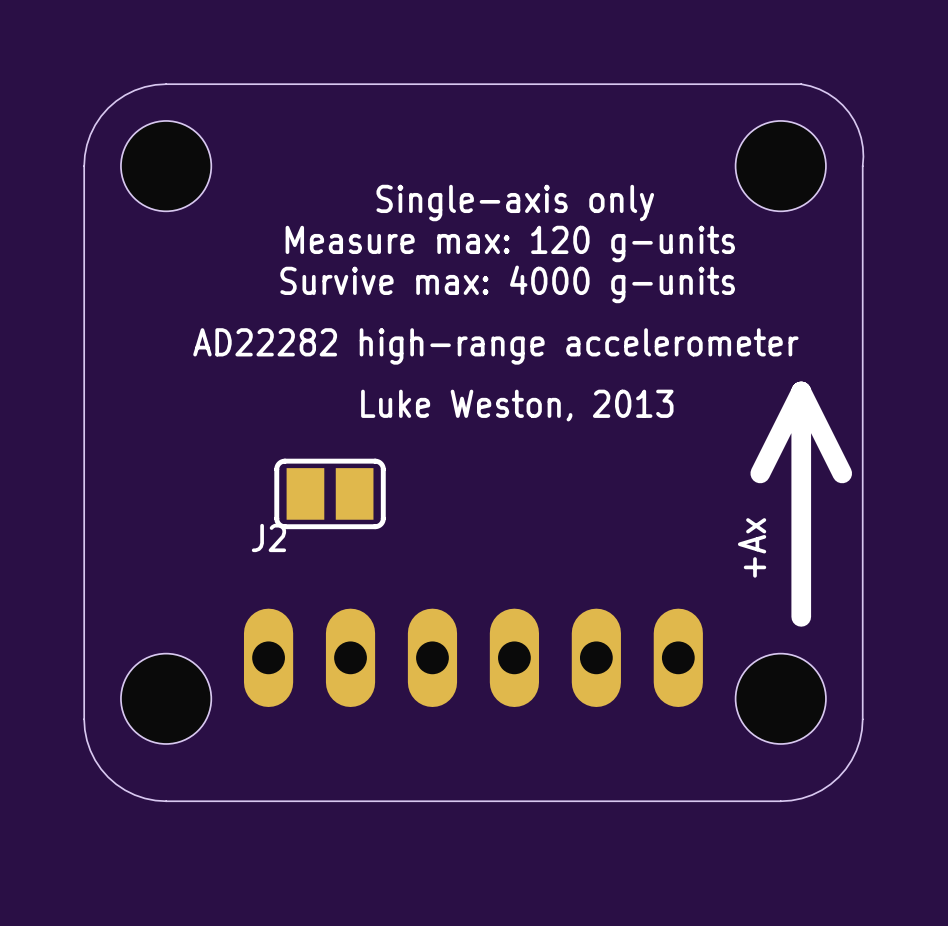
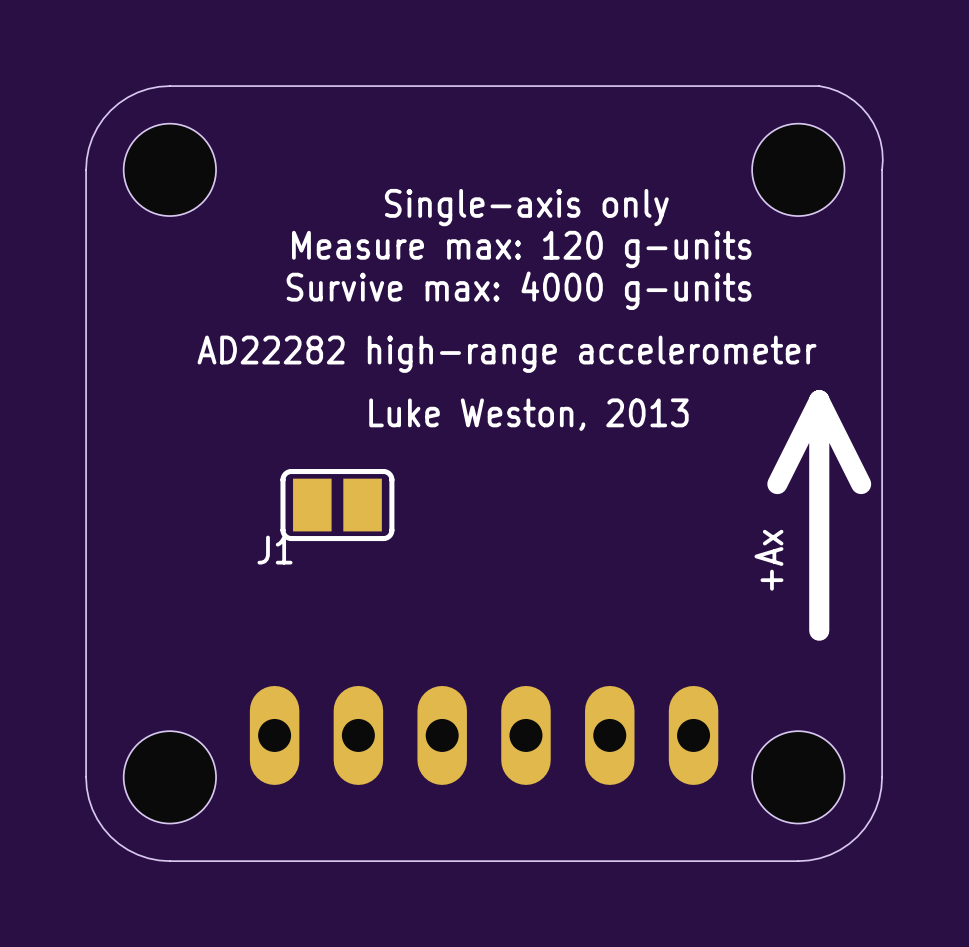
J2 name: J2 (268, 537) -> J1 (274, 550)
part: (473, 657) -> none
hole position: (166, 698) -> (169, 777)
hole position: (780, 698) -> (798, 777)
part: none -> (484, 735)
board edge: (862, 719) (856, 750) (838, 777) (812, 795) (780, 801) (155, 800) (134, 795) (108, 777) (90, 750) (84, 719) -> (882, 735) (881, 788) (870, 819) (857, 836) (840, 849) (819, 858) (798, 861) (158, 860) (137, 854) (118, 843) (97, 819) (86, 788) (86, 735)

